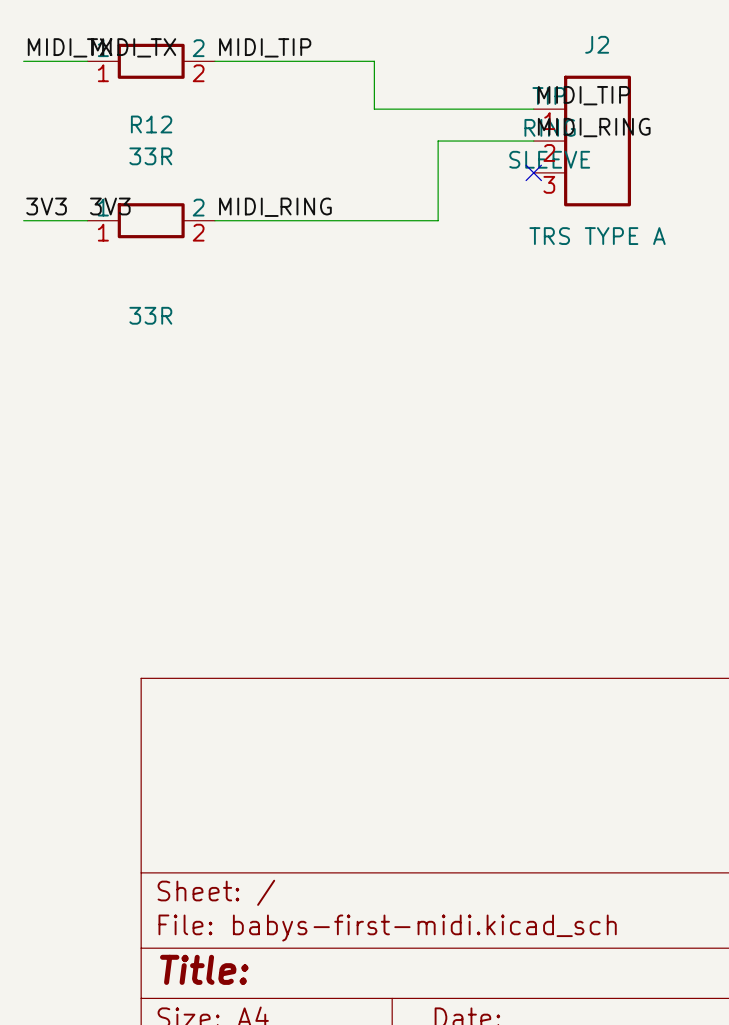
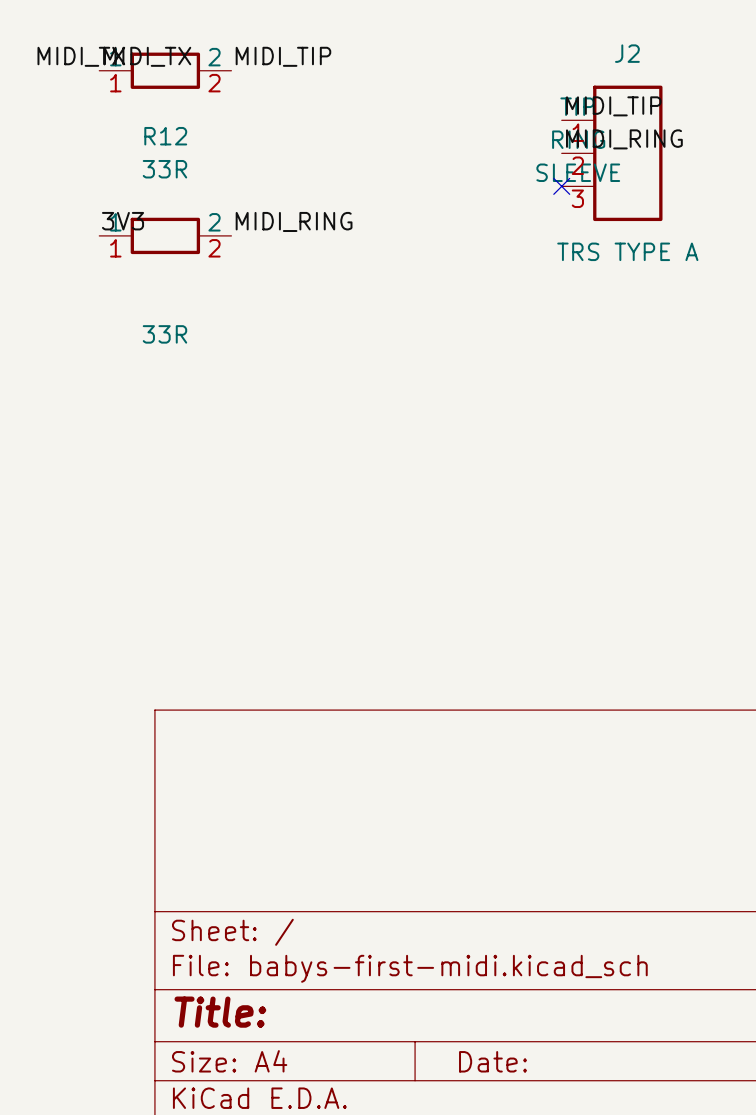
wire: (23, 61) (87, 61) -> none
wire: (214, 61) (374, 61) (374, 109) (533, 109) -> none
wire: (533, 141) (438, 141) (438, 220) (214, 220) -> none
label: 3V3 (46, 206) -> none
wire: (23, 220) (87, 220) -> none

